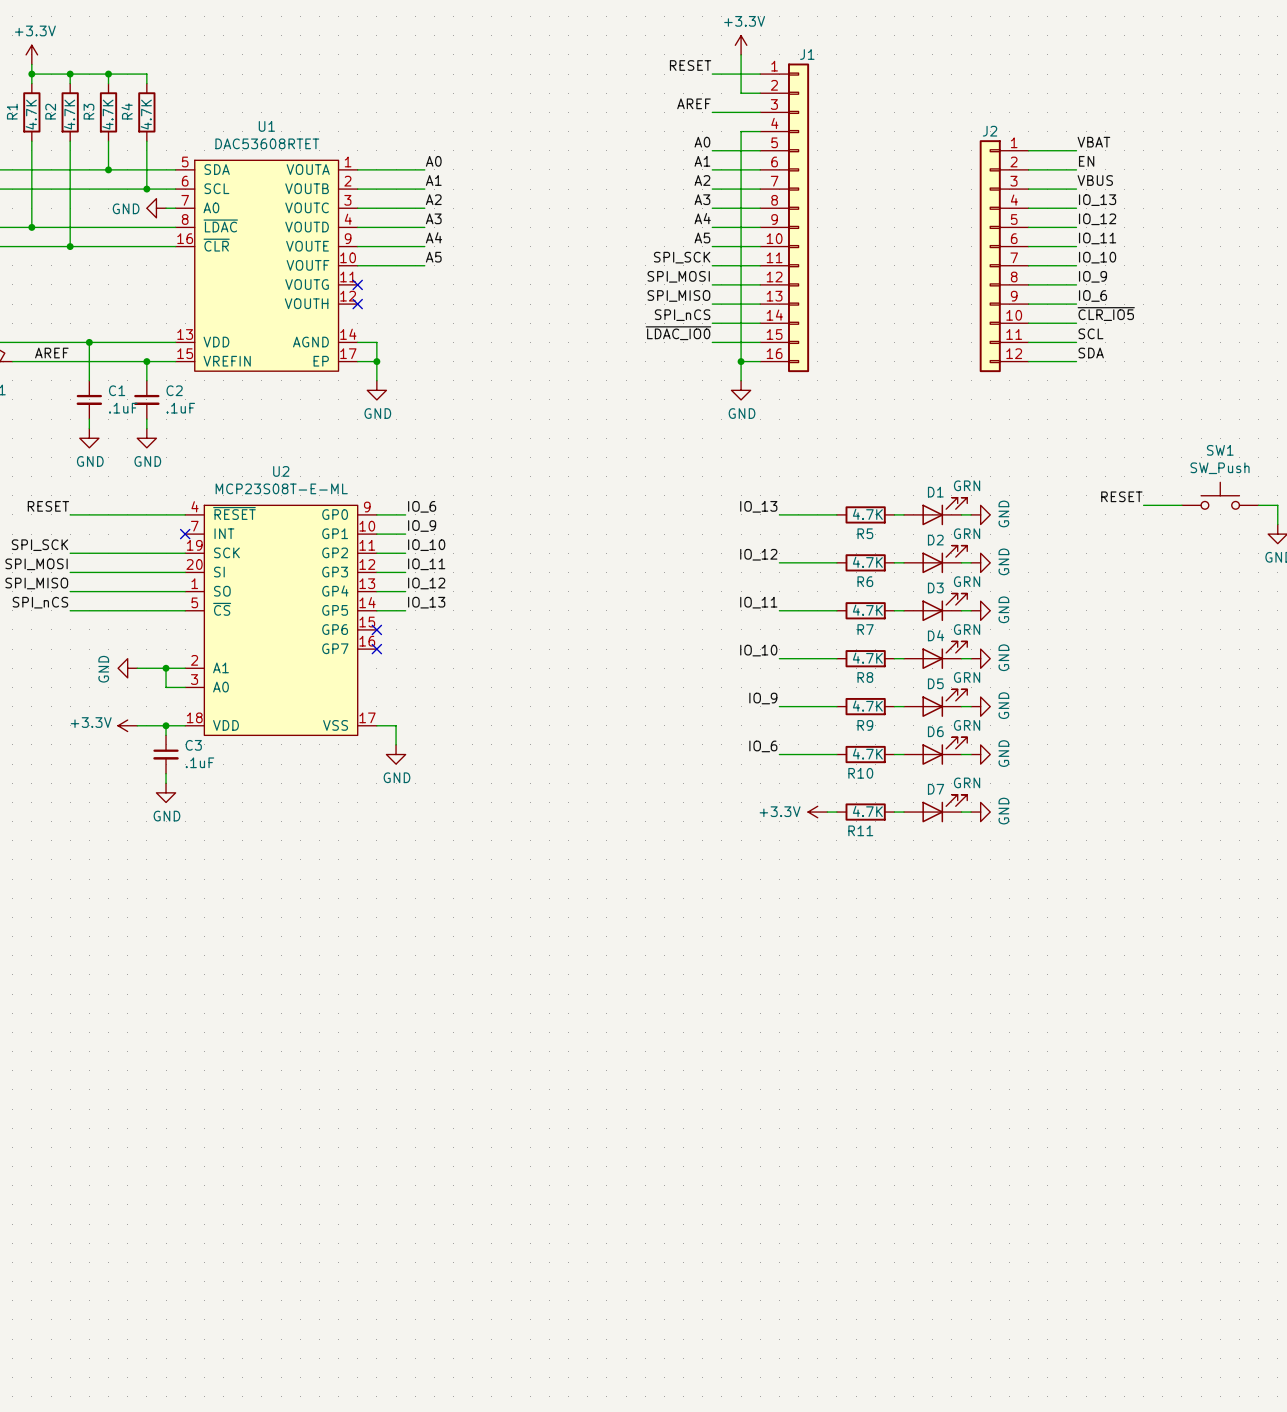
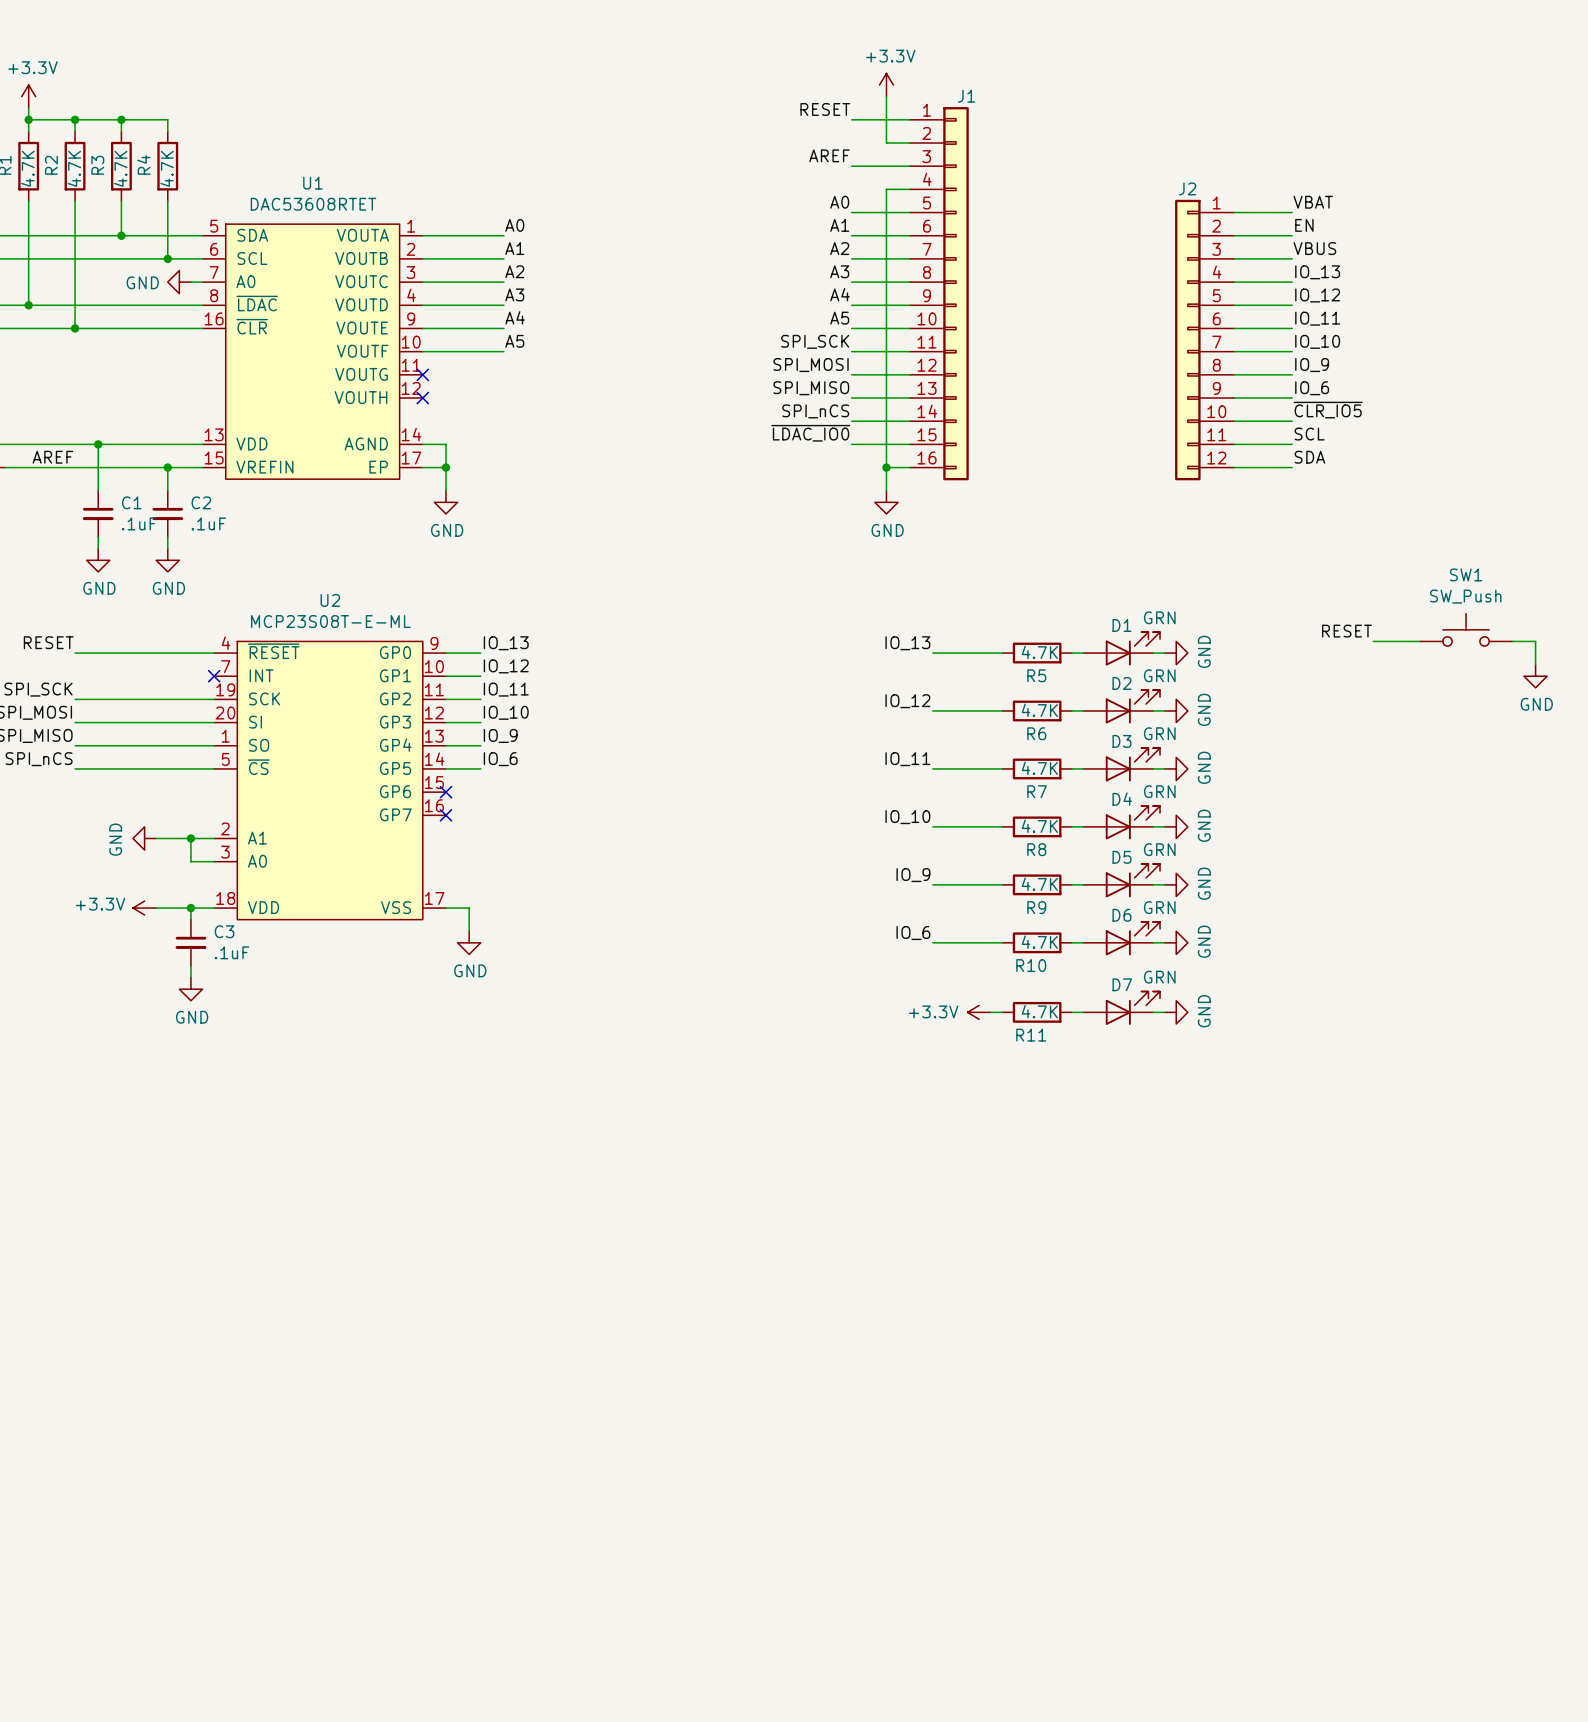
label: IO_6 (422, 506) -> IO_13 (506, 643)
label: IO_9 (422, 525) -> IO_12 (506, 666)
label: IO_10 (426, 545) -> IO_11 (506, 689)
label: IO_11 (426, 564) -> IO_10 (506, 712)
label: IO_12 (426, 583) -> IO_9 (500, 735)
label: IO_13 (426, 602) -> IO_6 (500, 759)

